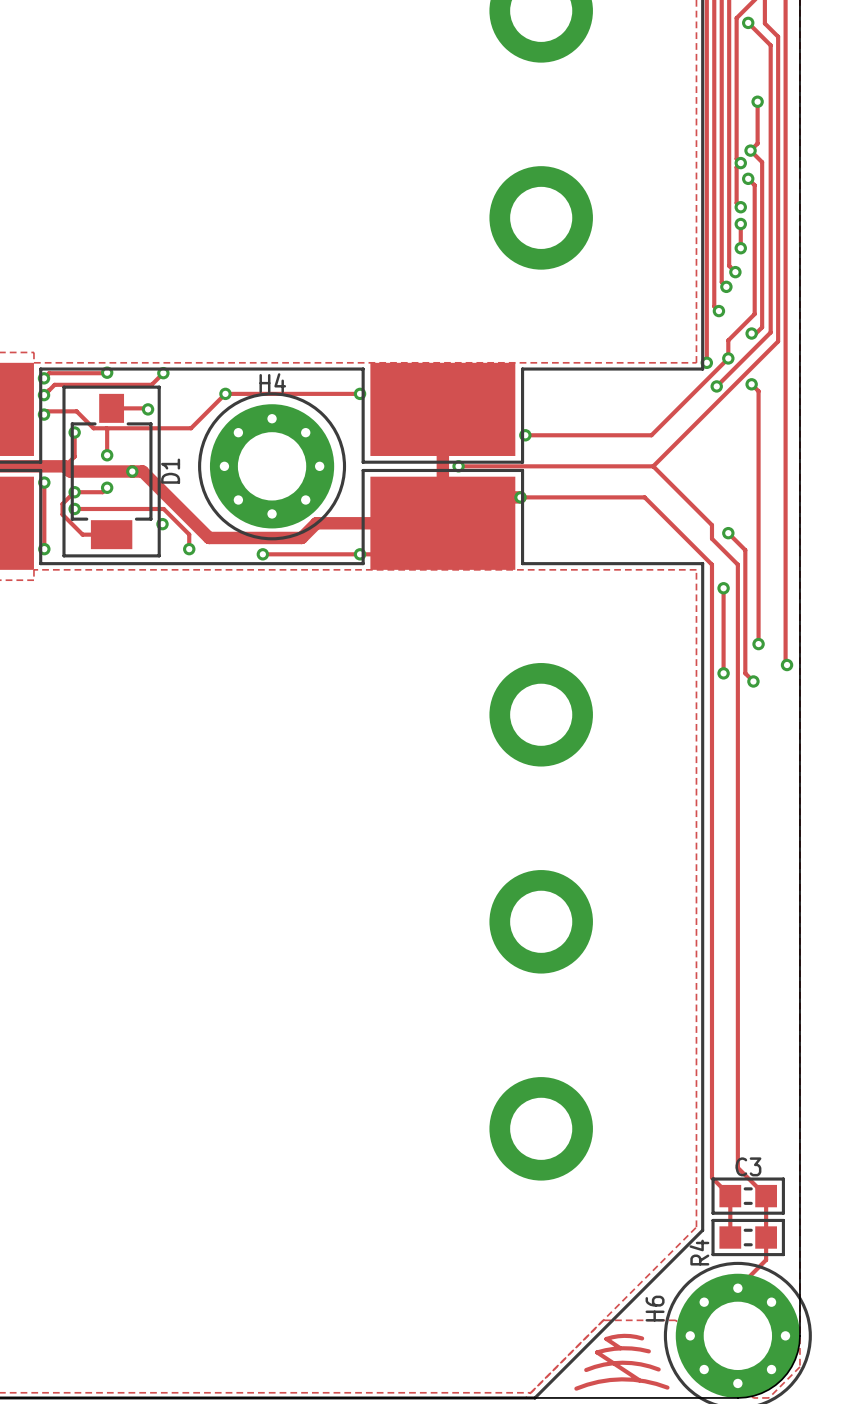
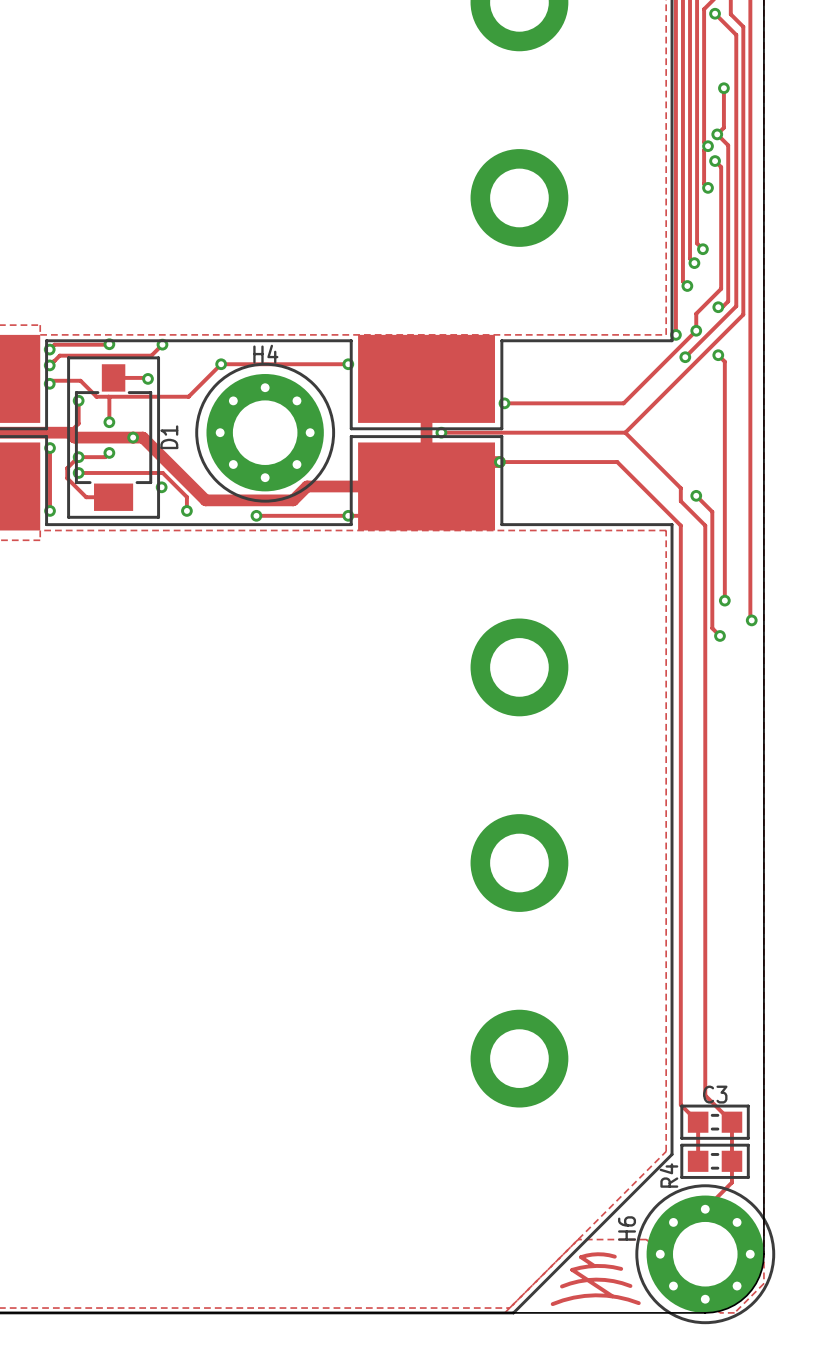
track: (740, 224) (740, 248) -> none
via: (740, 224) -> none
via: (740, 248) -> none
track: (723, 588) (723, 673) -> none
via: (723, 588) -> none
via: (723, 673) -> none

